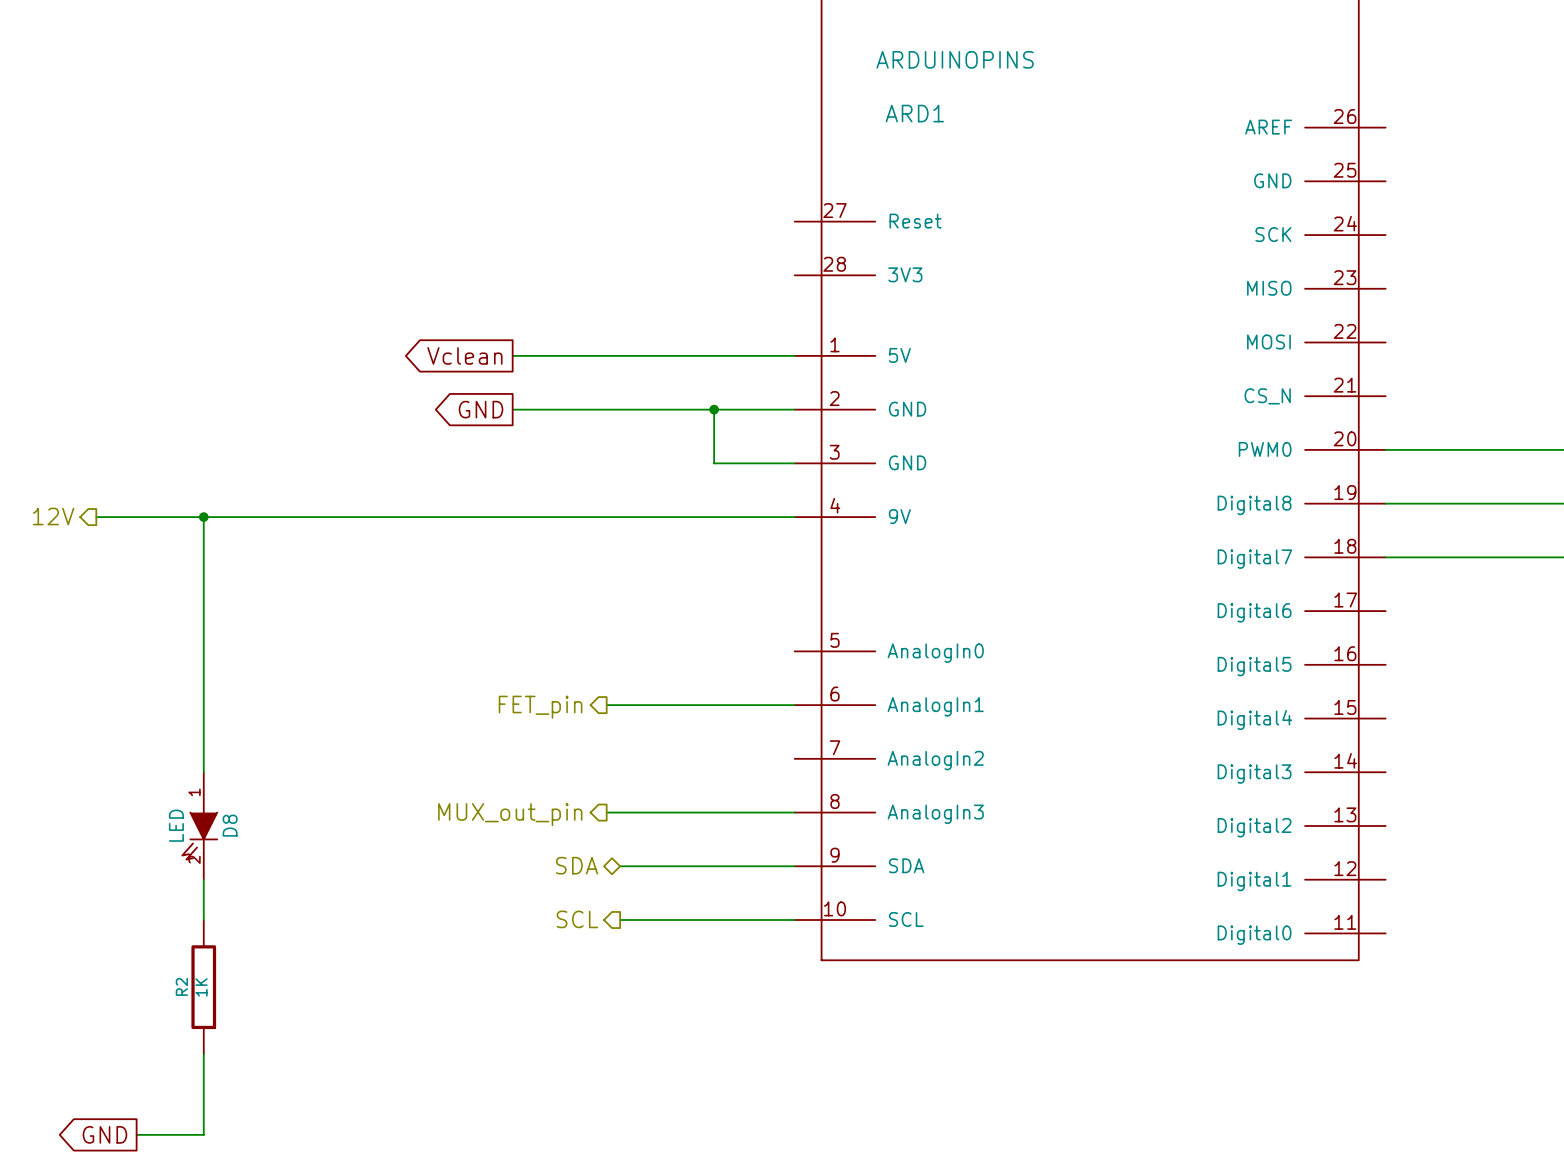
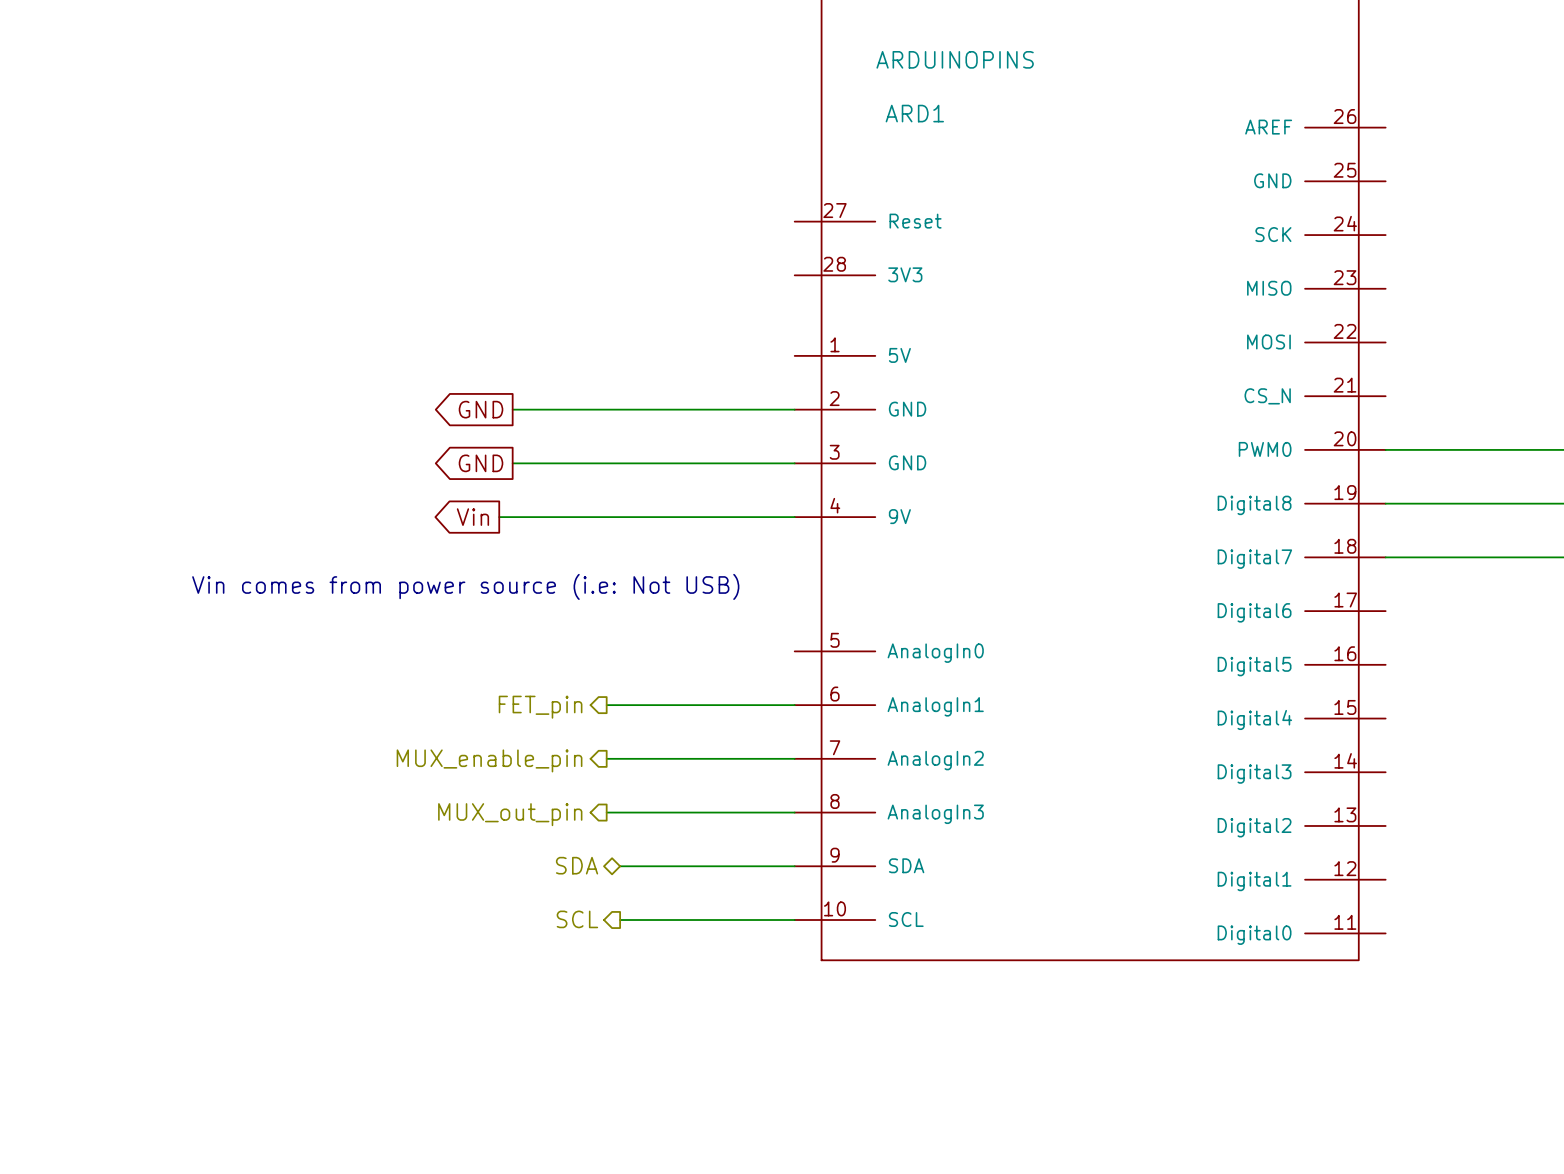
global label: Vclean (464, 355) -> none
wire: (512, 355) (794, 355) -> none
wire: (714, 409) (714, 463) -> (512, 463) (714, 463)
junction: (714, 409) -> none
global label: none -> GND (481, 463)
hierarchical label: 12V (53, 516) -> none
wire: (96, 517) (499, 517) -> none
wire: (203, 517) (203, 772) -> none
junction: (203, 517) -> none
global label: none -> Vin (472, 517)
text: none -> Vin comes from power source (i.e: Not USB) (465, 586)
wire: none -> (606, 758) (794, 758)
hierarchical label: none -> MUX_enable_pin (489, 760)
D8: LED (199, 825) -> none
wire: (203, 879) (203, 920) -> none
R2: 1K (203, 987) -> none
wire: (203, 1054) (203, 1134) (136, 1134) -> none
global label: GND (104, 1134) -> none

